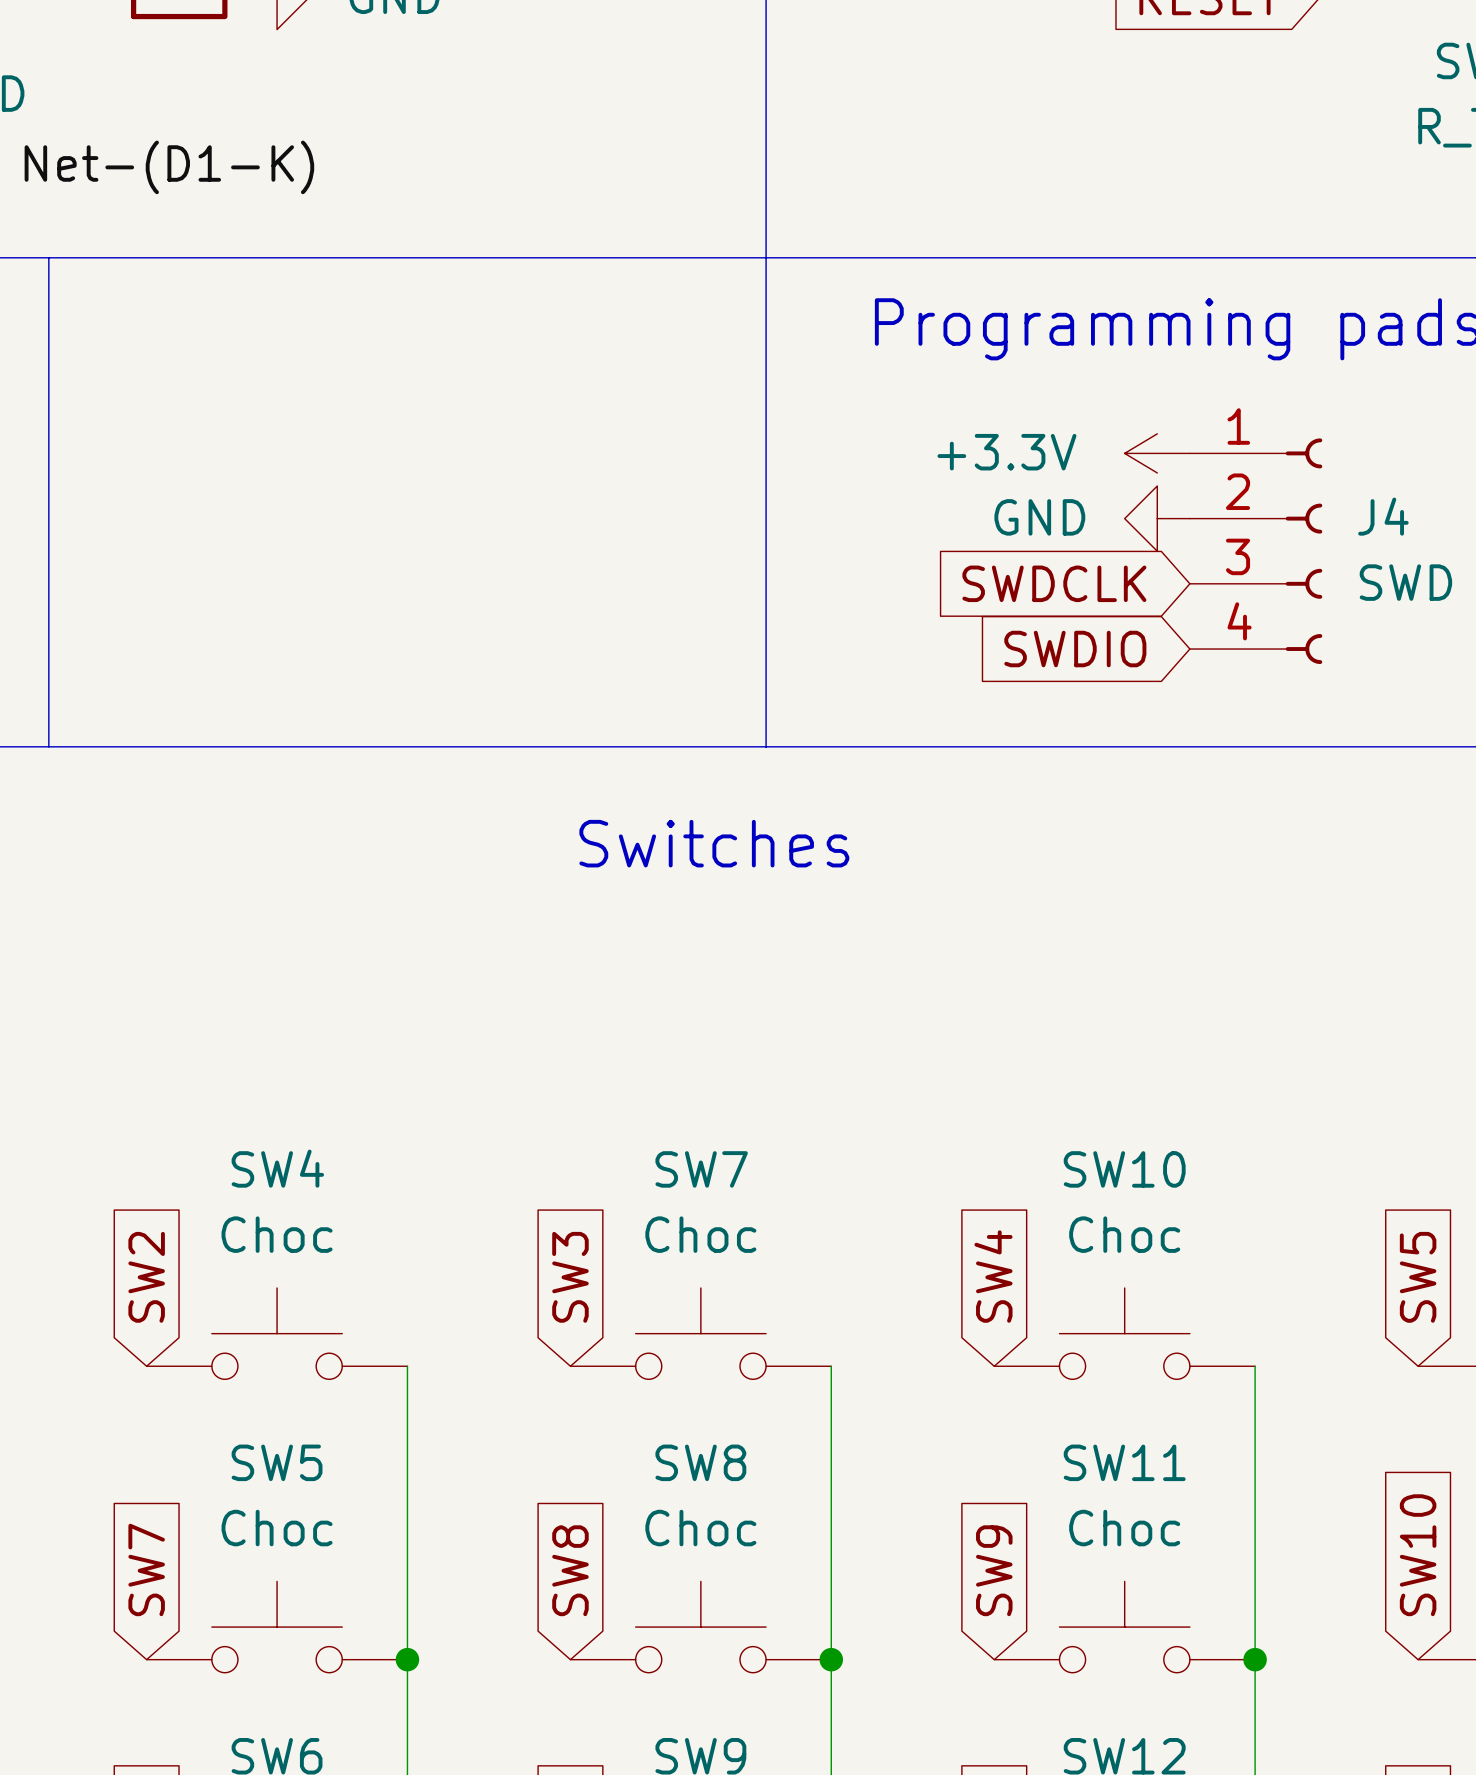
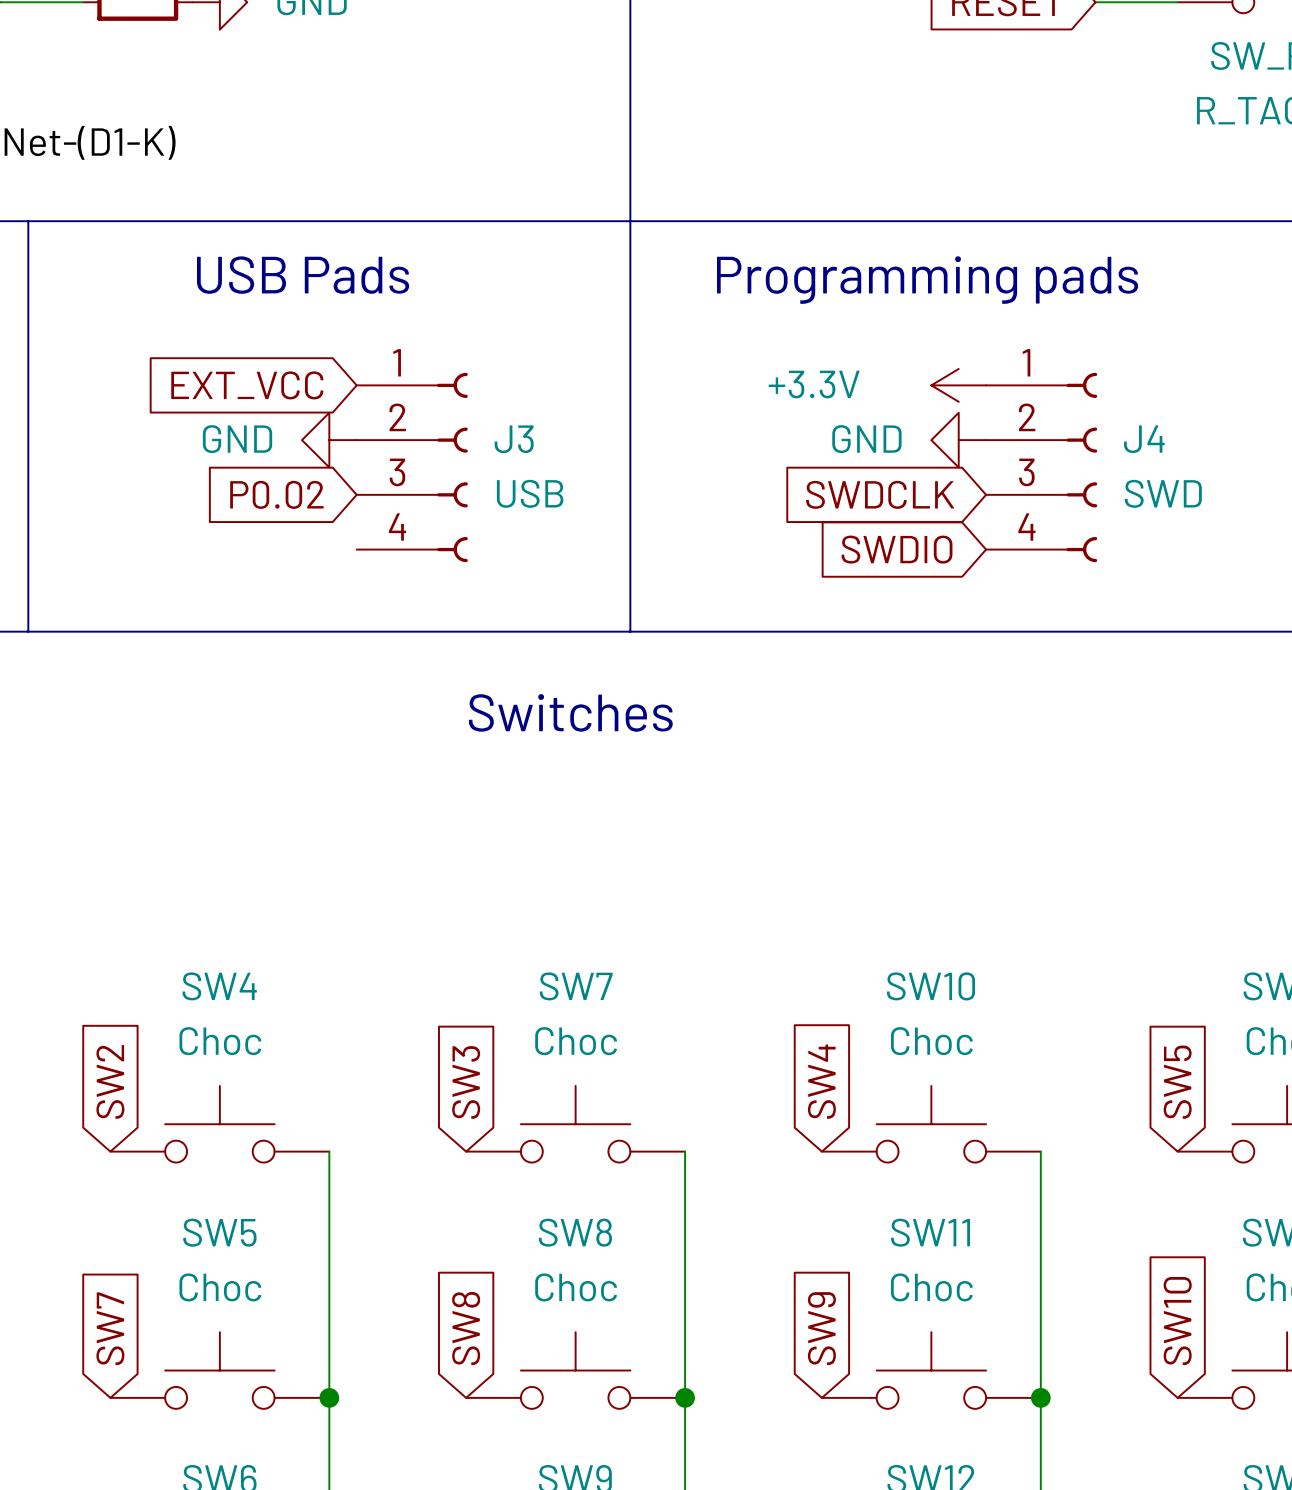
text: none -> USB Pads (303, 275)
global label: none -> EXT_VCC (247, 385)
power symbol: none -> GND (329, 440)
J3: none -> USB (412, 467)
global label: none -> P0.02 (276, 494)

